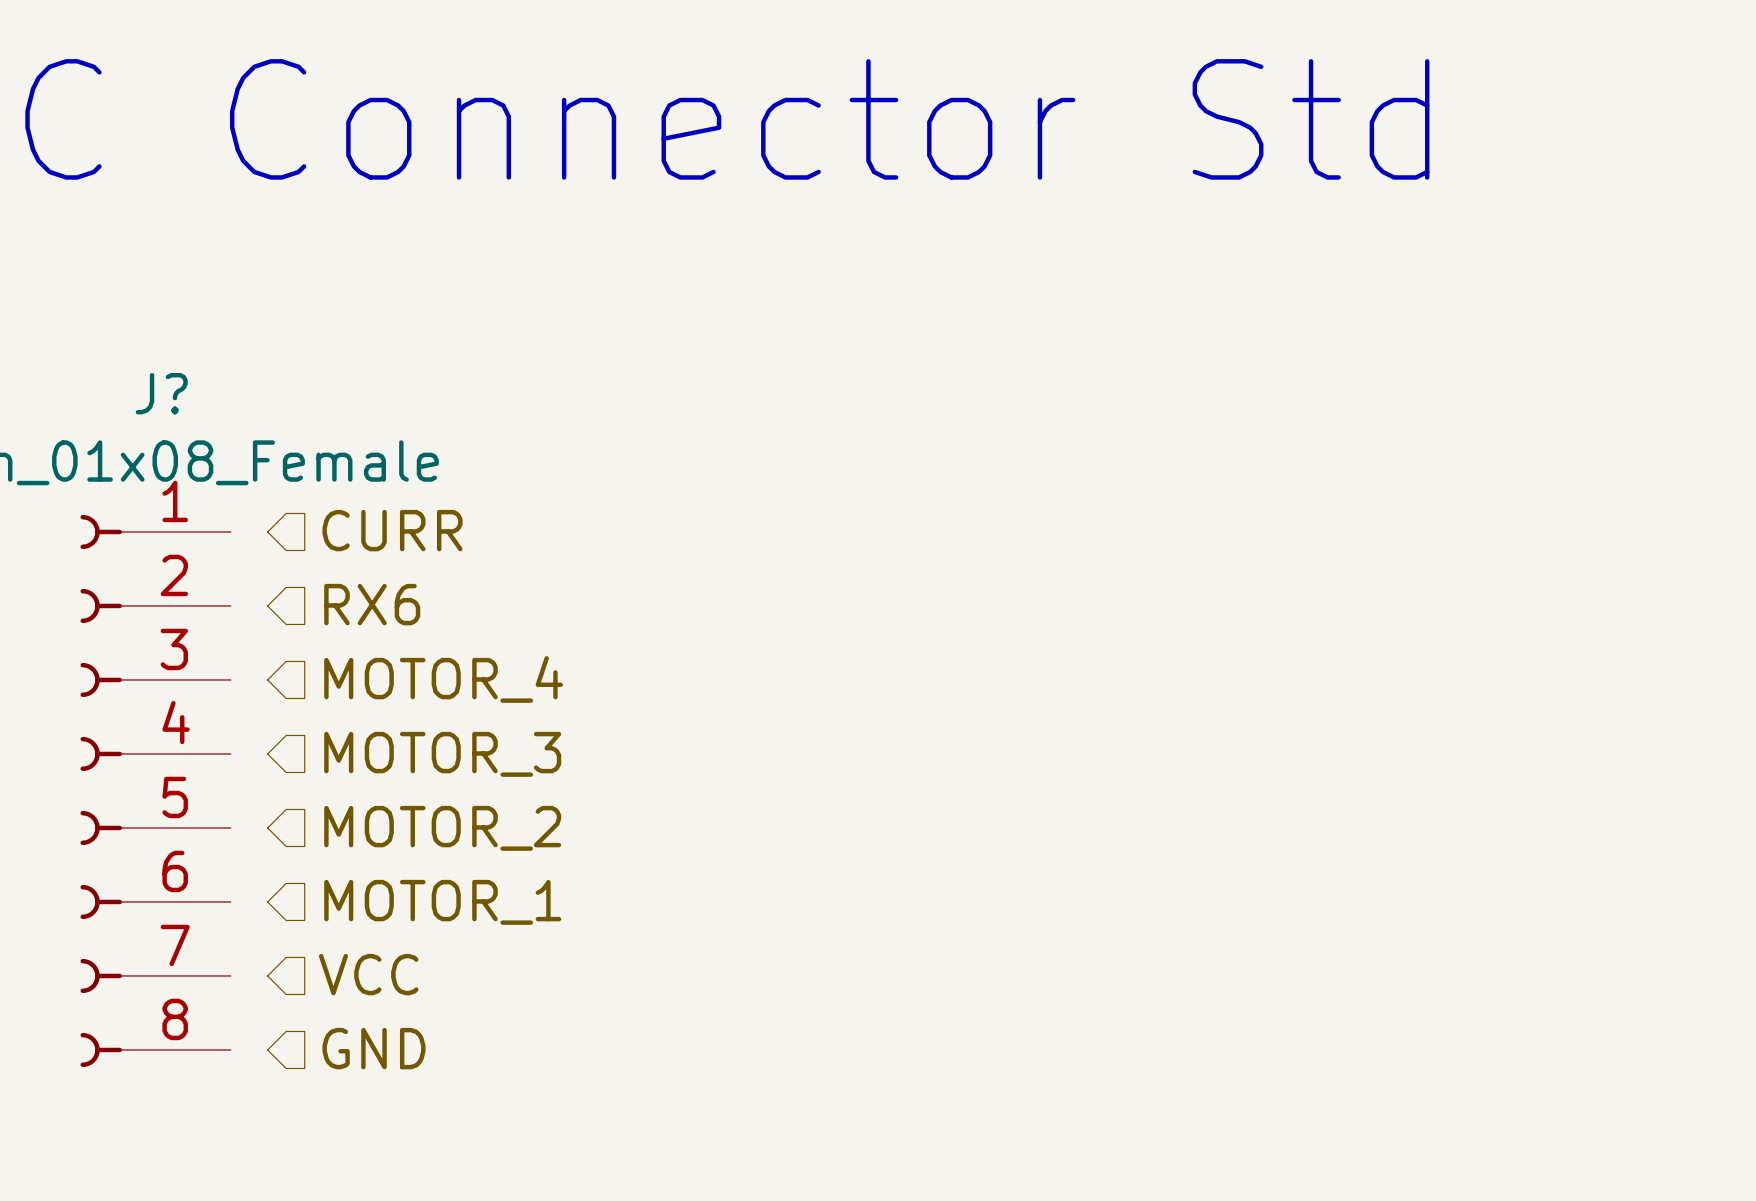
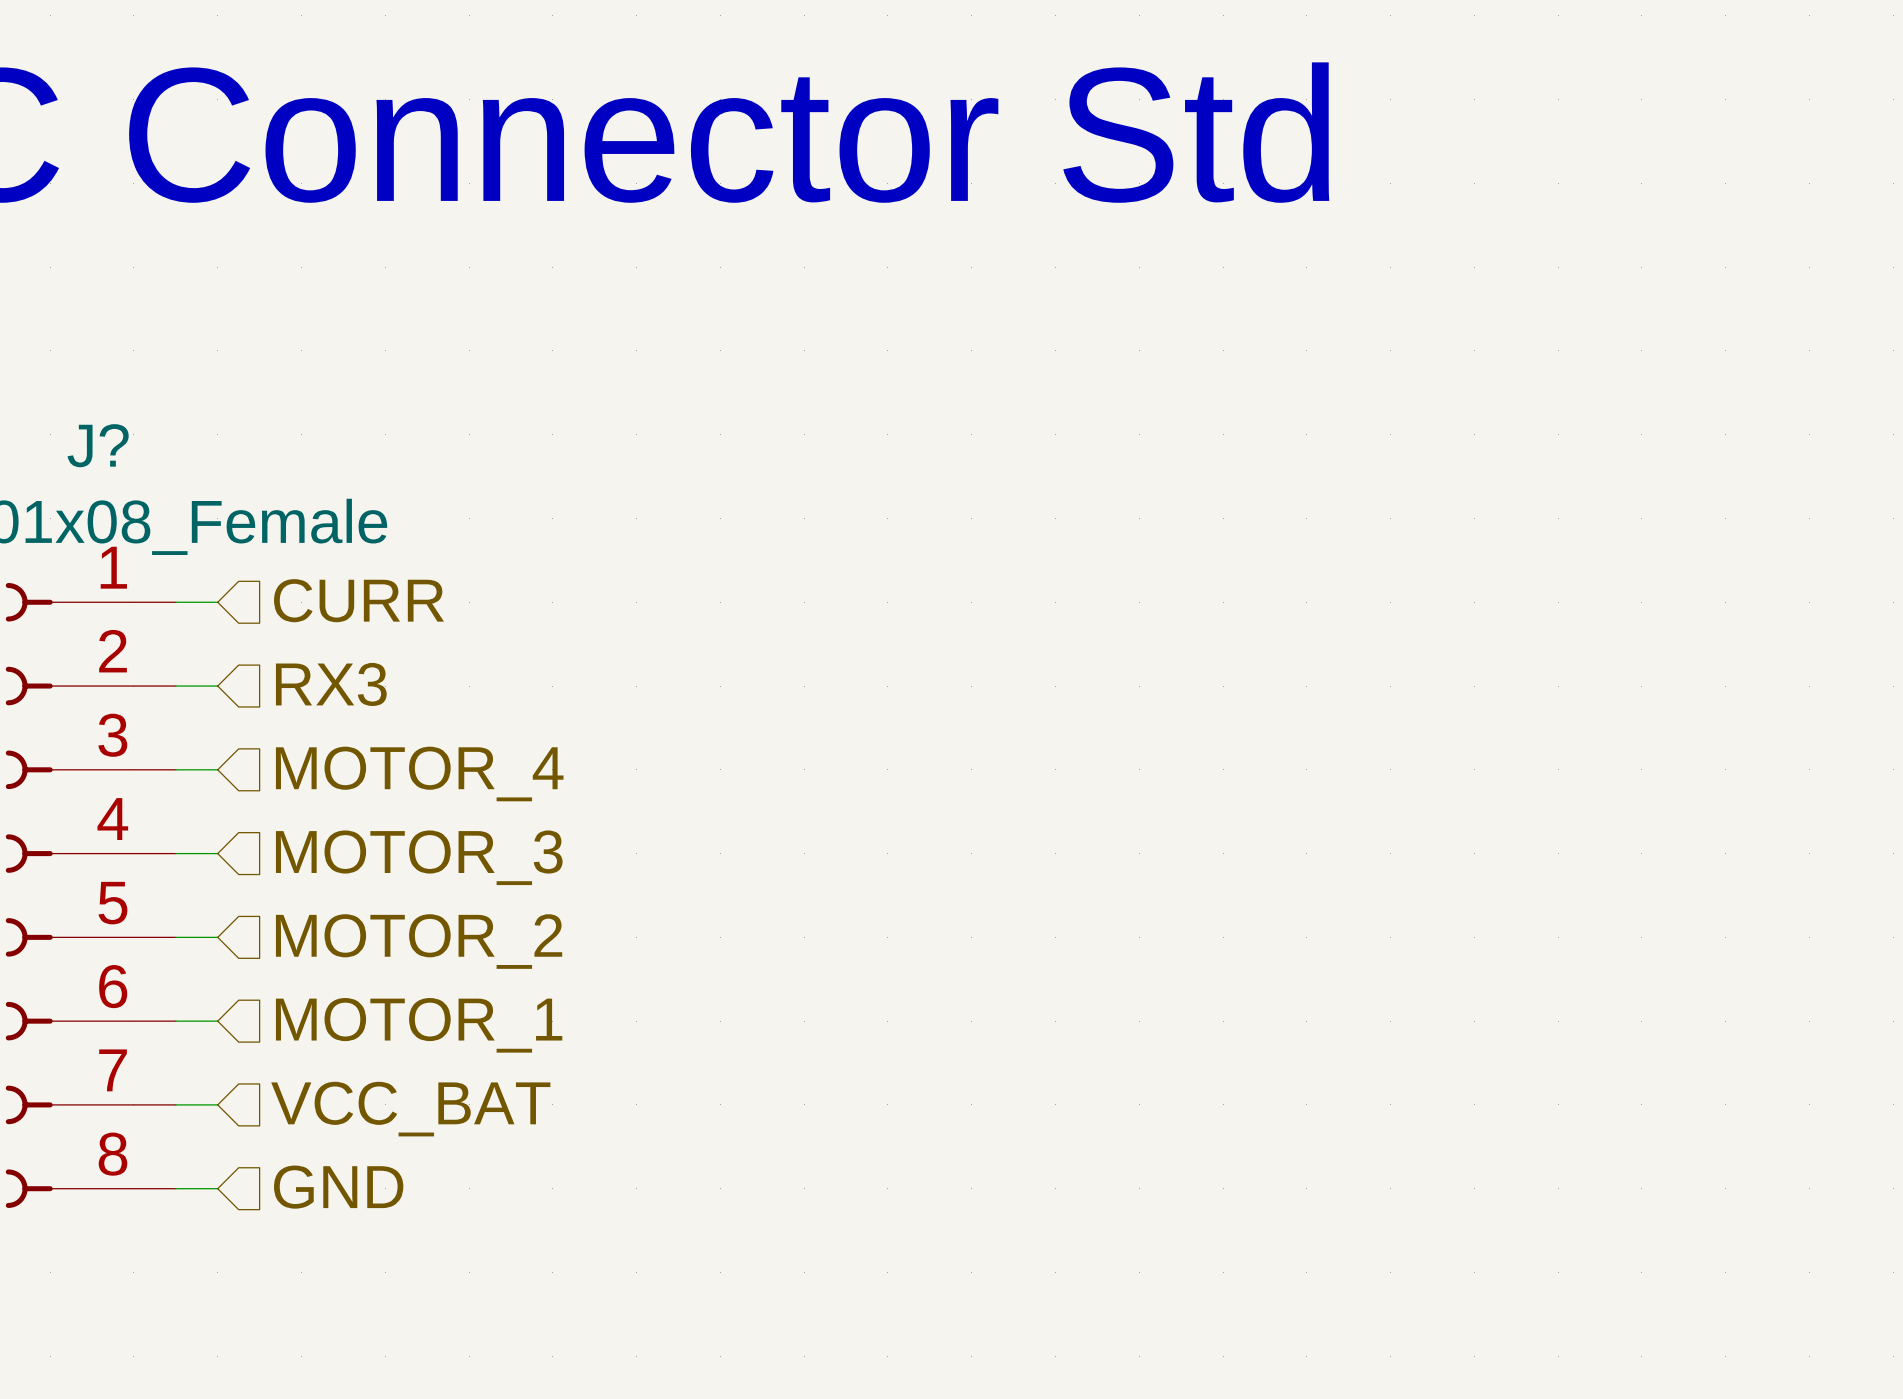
wire: none -> (175, 602) (217, 602)
hierarchical label: RX6 (372, 604) -> RX3 (331, 684)
wire: none -> (175, 686) (217, 686)
wire: none -> (175, 769) (217, 769)
wire: none -> (175, 853) (217, 853)
wire: none -> (175, 937) (217, 937)
wire: none -> (175, 1021) (217, 1021)
hierarchical label: VCC (368, 974) -> VCC_BAT (410, 1109)
wire: none -> (175, 1104) (217, 1104)
wire: none -> (175, 1188) (217, 1188)

